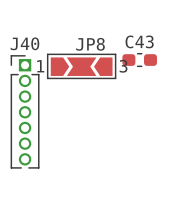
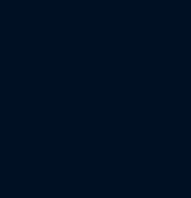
C43: (139, 60) -> none
JP8: (81, 66) -> none
J40: (25, 111) -> none

